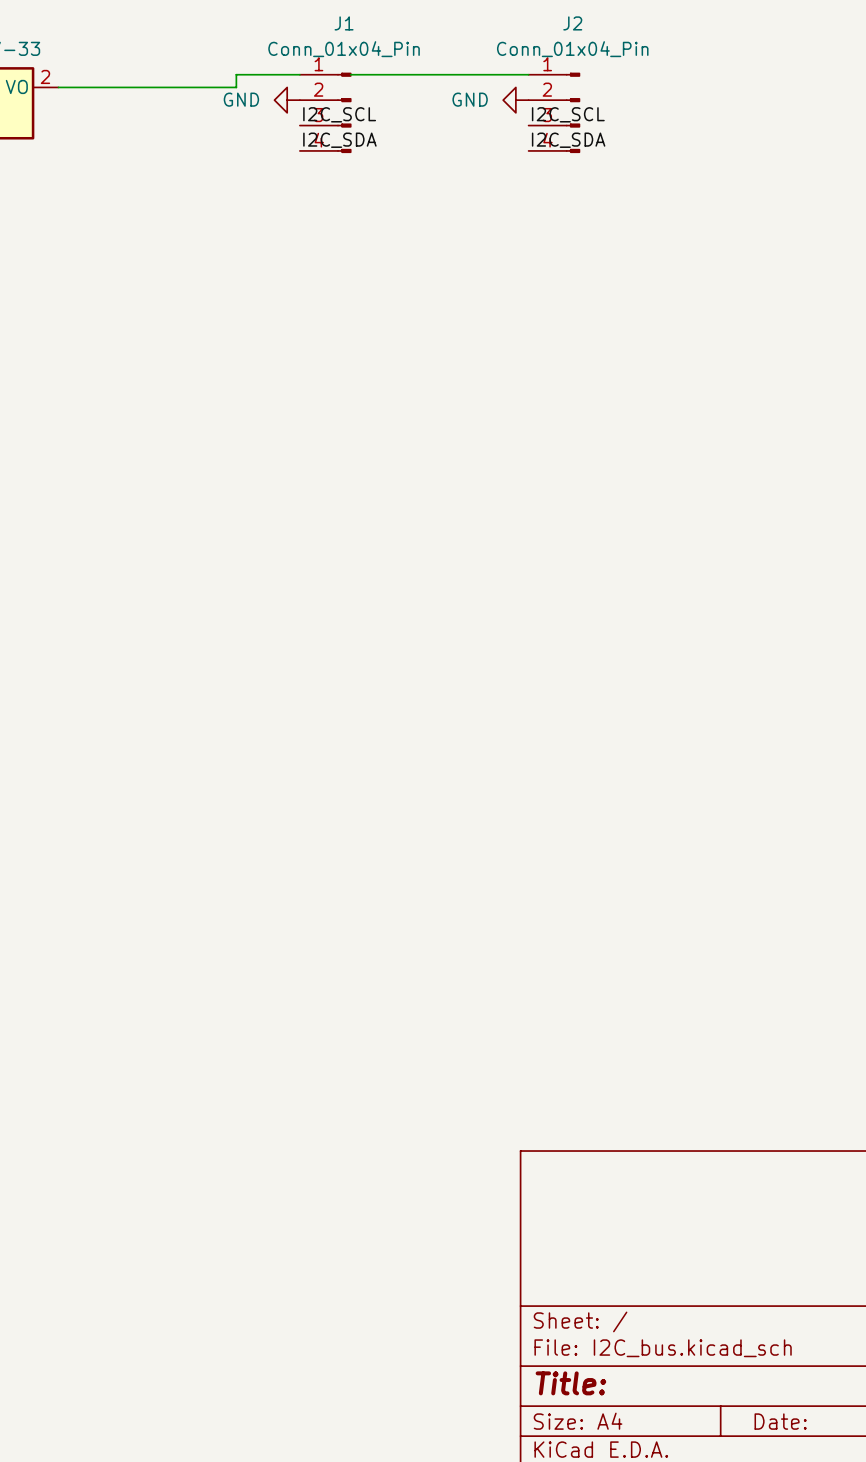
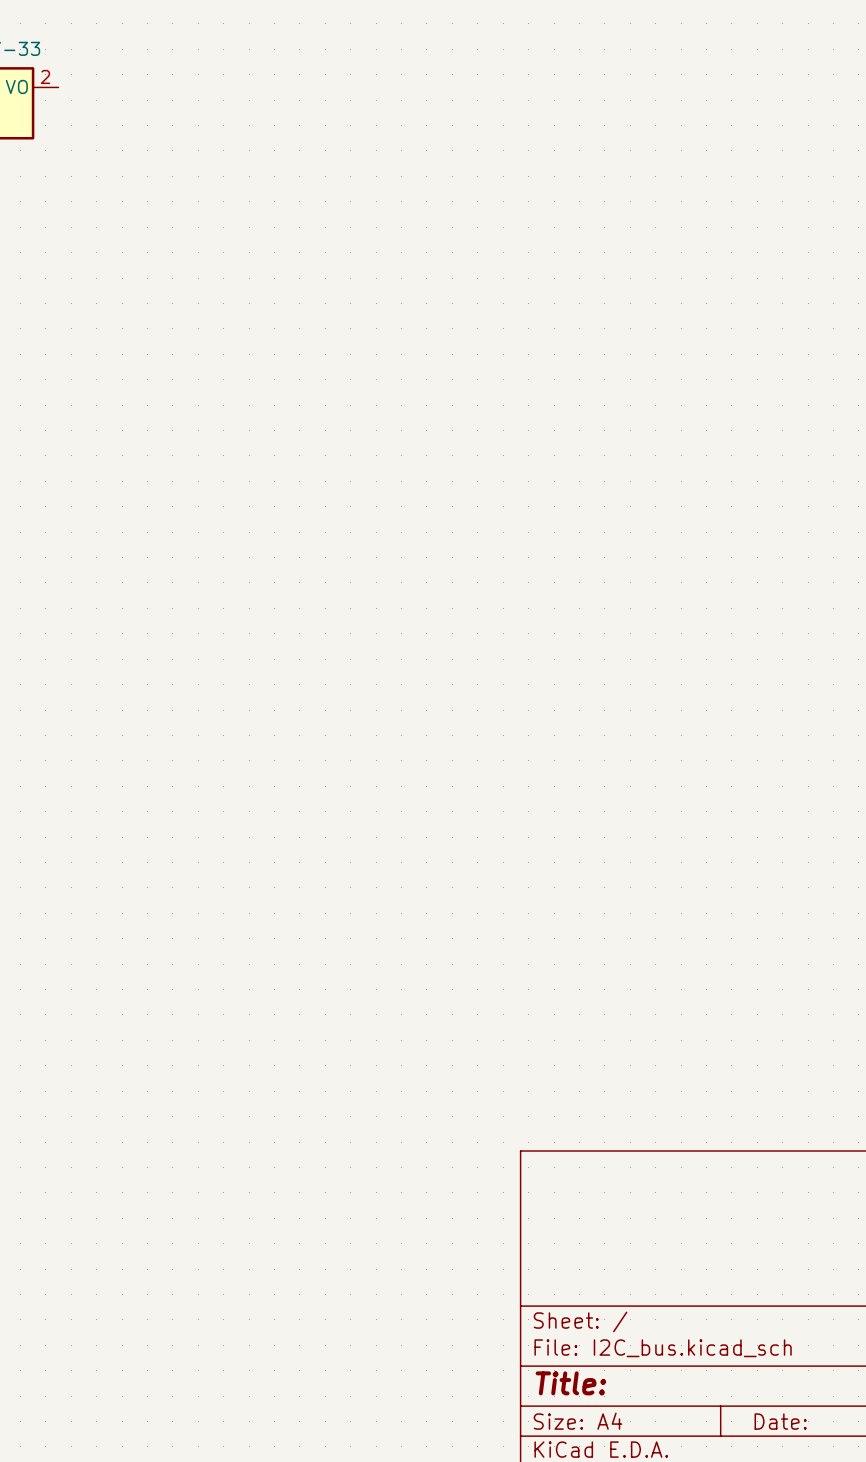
wire: (299, 74) (236, 74) (236, 87) (58, 87) -> none
wire: (350, 74) (528, 74) -> none
power symbol: GND (287, 100) -> none
power symbol: GND (515, 100) -> none
J1: Conn_01x04_Pin (325, 112) -> none
J2: Conn_01x04_Pin (554, 112) -> none
label: I2C_SCL (339, 114) -> none
label: I2C_SCL (568, 114) -> none
label: I2C_SDA (339, 140) -> none
label: I2C_SDA (568, 140) -> none

